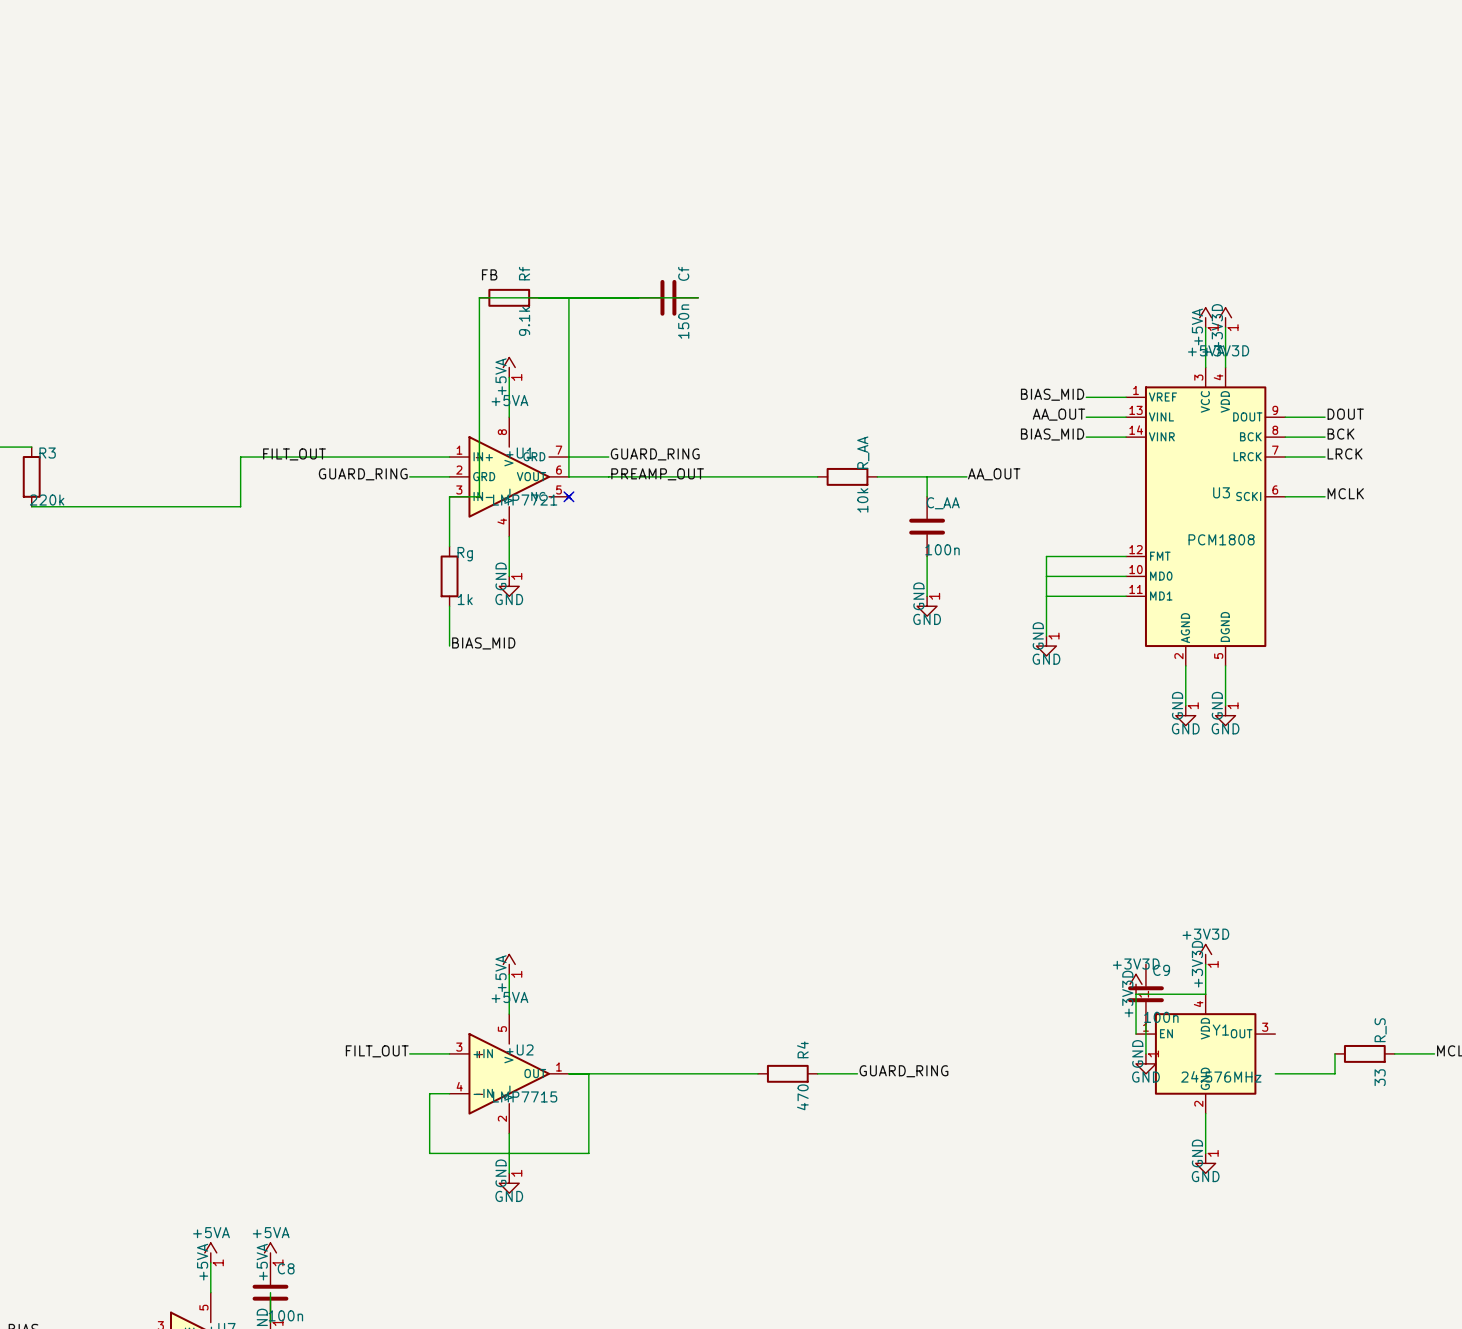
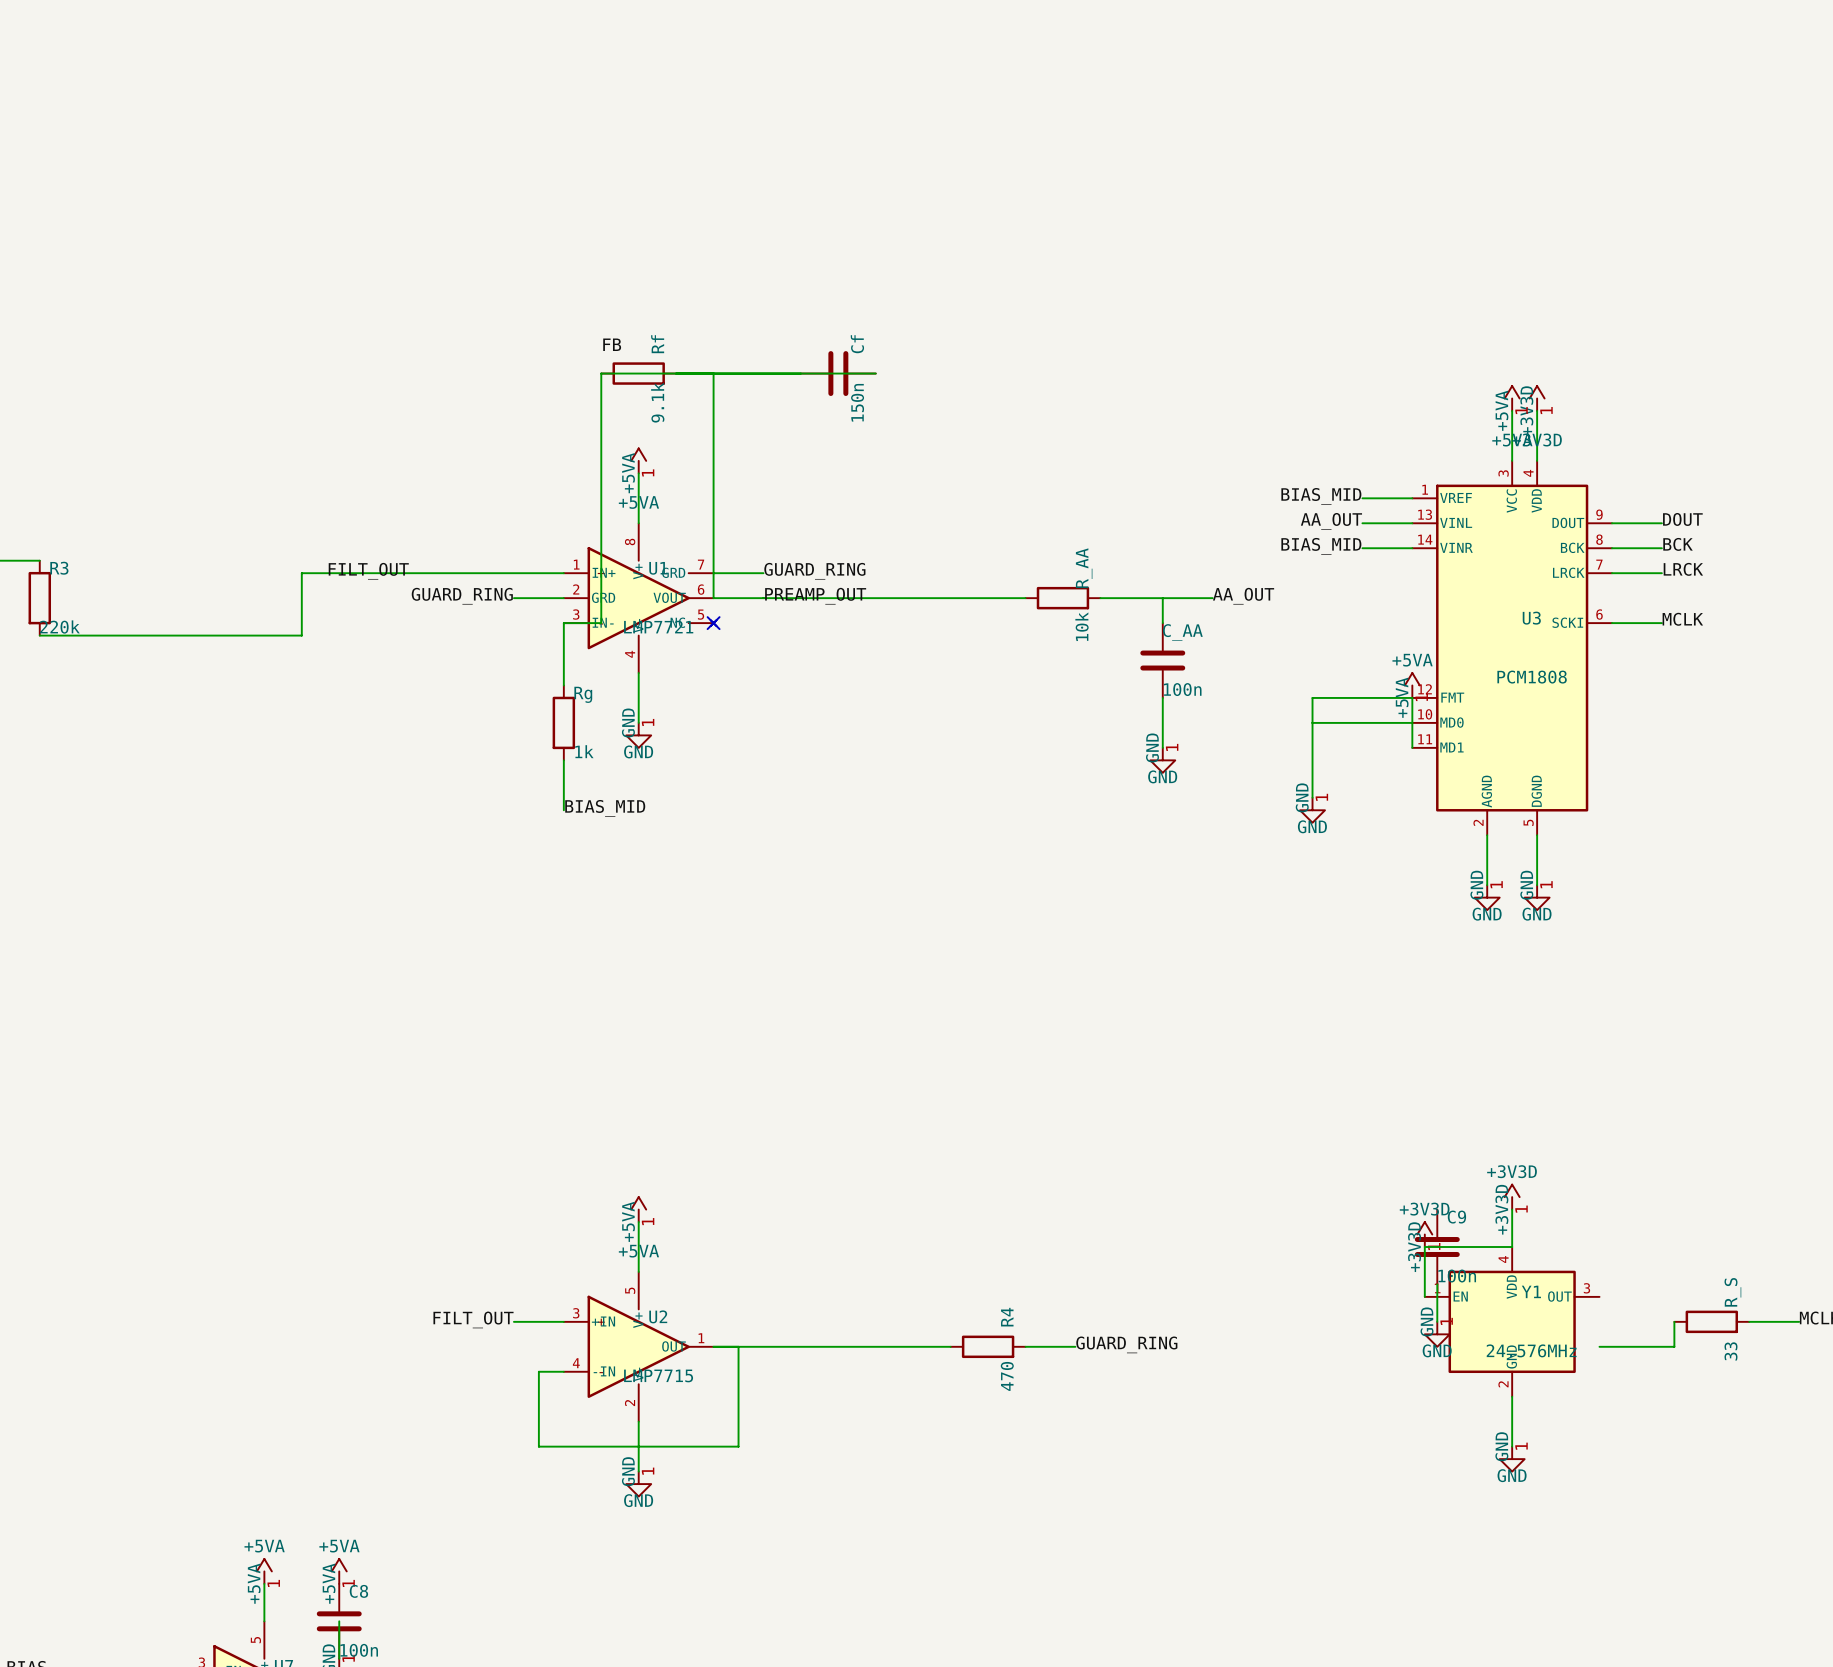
power symbol: none -> +5VA (1412, 685)
wire: (1046, 596) (1126, 596) -> (1412, 697) (1412, 747)

